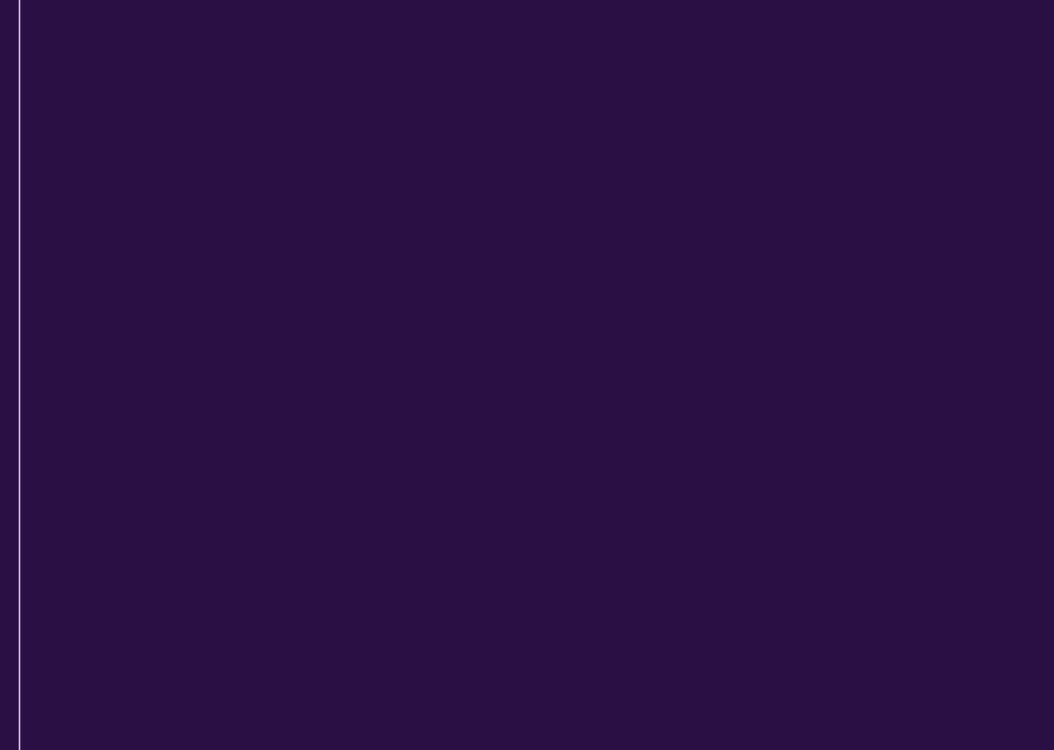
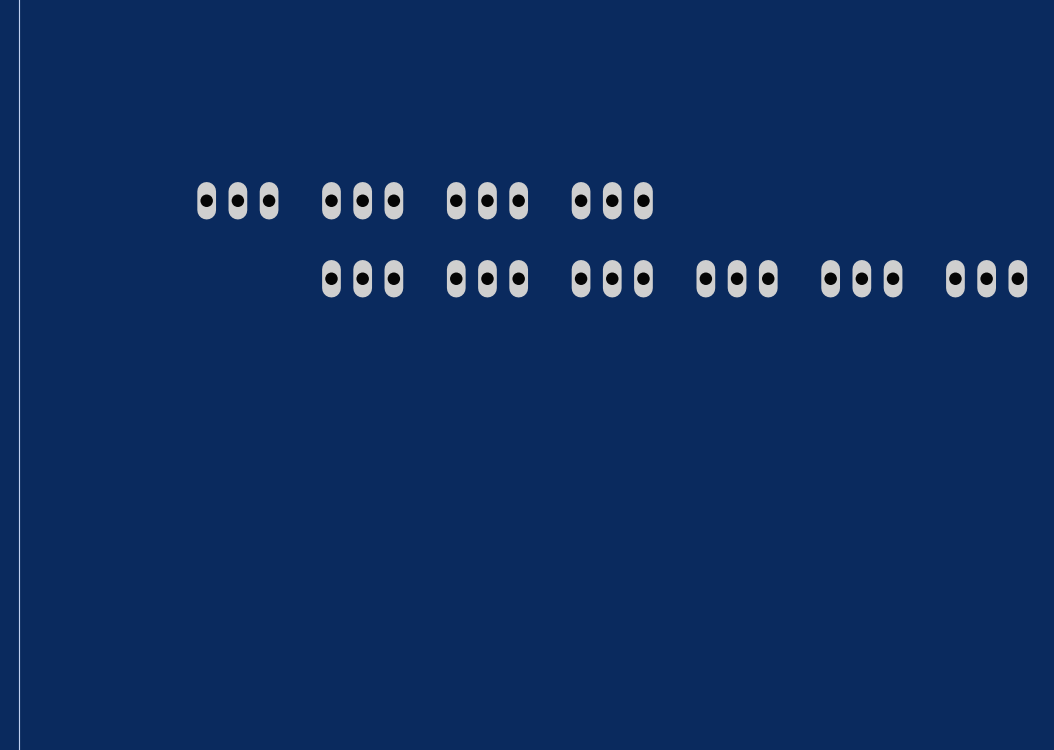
part: none -> (237, 200)
part: none -> (362, 200)
part: none -> (487, 200)
part: none -> (612, 200)
part: none -> (362, 278)
part: none -> (487, 278)
part: none -> (612, 278)
part: none -> (737, 278)
part: none -> (861, 278)
part: none -> (986, 278)

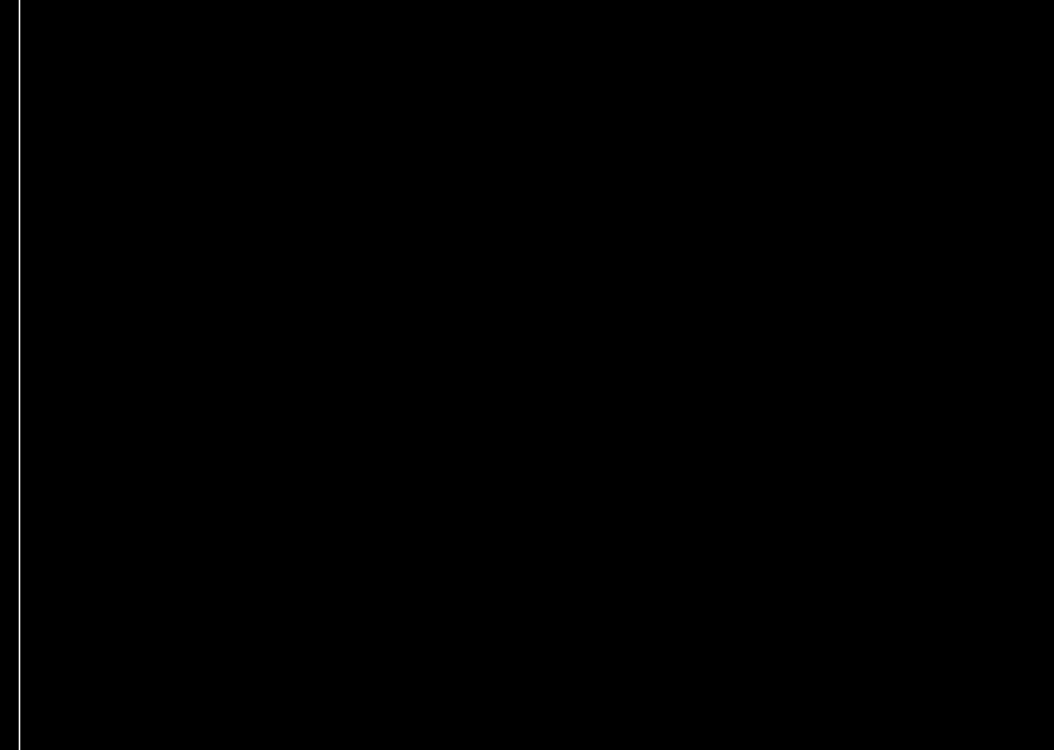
part: (237, 200) -> none
part: (362, 200) -> none
part: (487, 200) -> none
part: (612, 200) -> none
part: (362, 278) -> none
part: (487, 278) -> none
part: (612, 278) -> none
part: (737, 278) -> none
part: (861, 278) -> none
part: (986, 278) -> none

